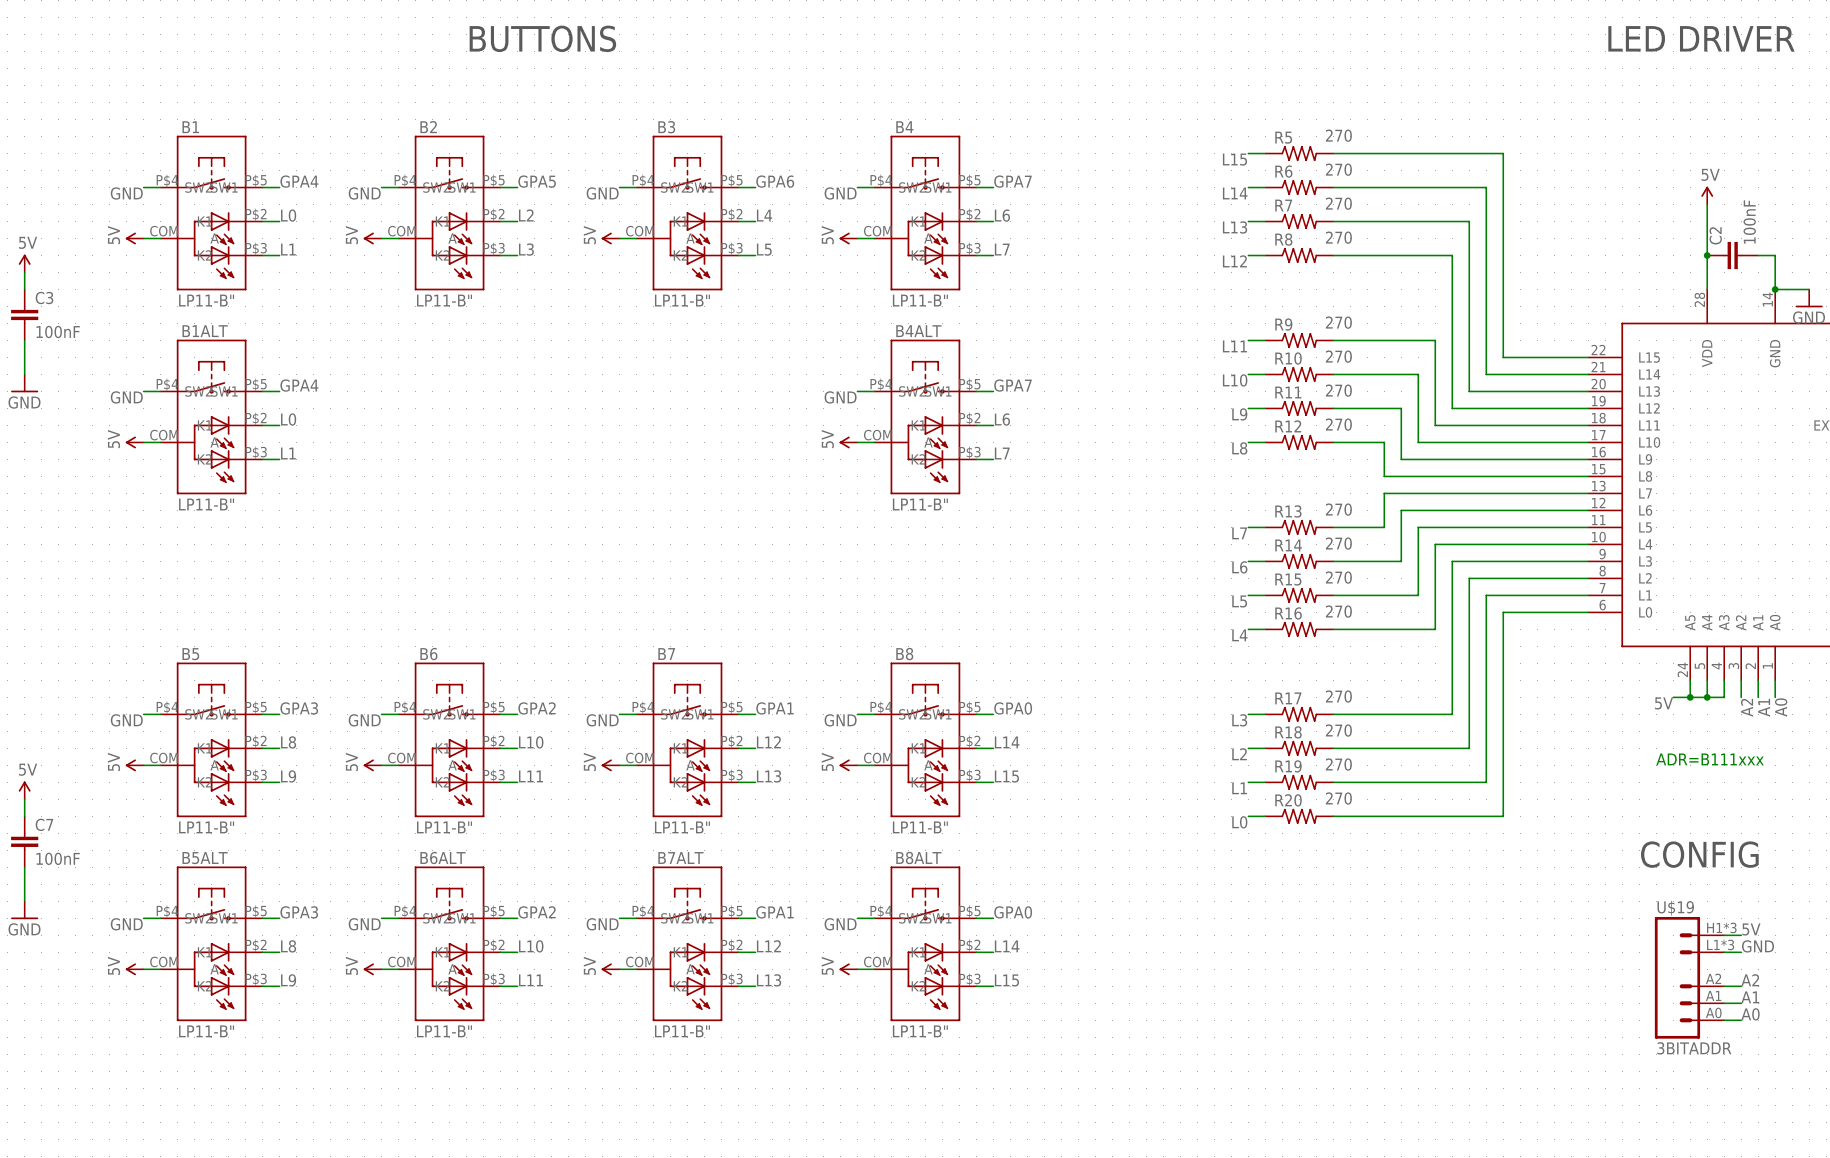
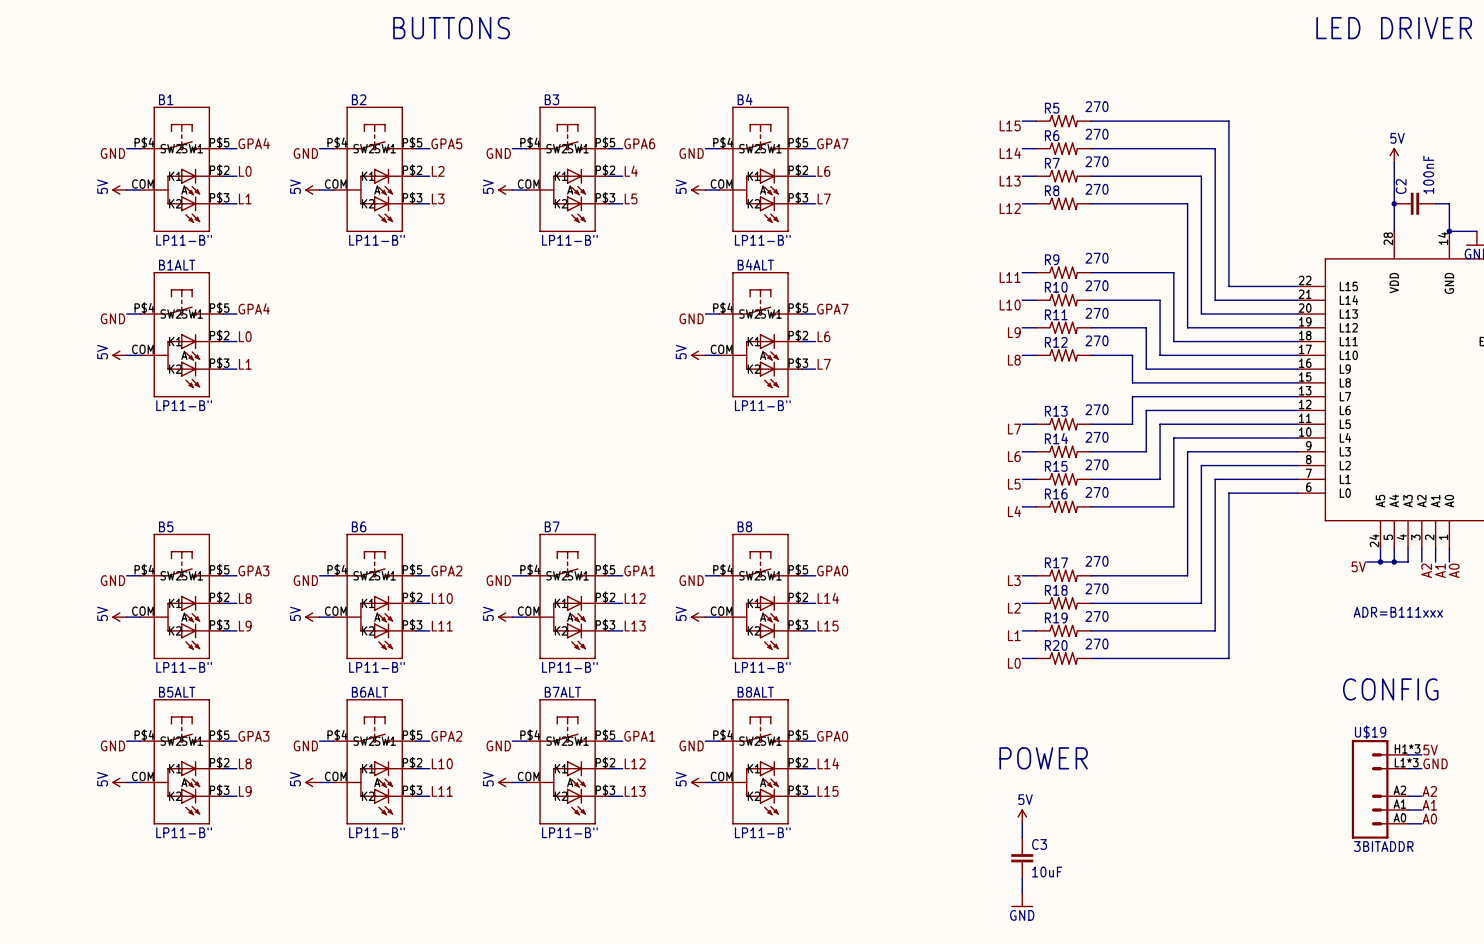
power symbol: 5V (24, 263) -> none
wire: (24, 272) (24, 289) -> none
C3 position: (24, 314) -> (1022, 858)
C3 value: 100nF (58, 332) -> 10uF (1047, 872)
wire: (24, 340) (24, 374) -> none
power symbol: GND (24, 383) -> none
power symbol: 5V (24, 790) -> none
wire: (24, 799) (24, 816) -> none
C7: 100nF (24, 841) -> none
wire: (24, 867) (24, 901) -> none
power symbol: GND (24, 910) -> none
text: none -> POWER (1043, 758)
power symbol: none -> 5V (1022, 816)
wire: none -> (1022, 823) (1022, 837)
wire: none -> (1022, 878) (1022, 892)
power symbol: none -> GND (1022, 899)

